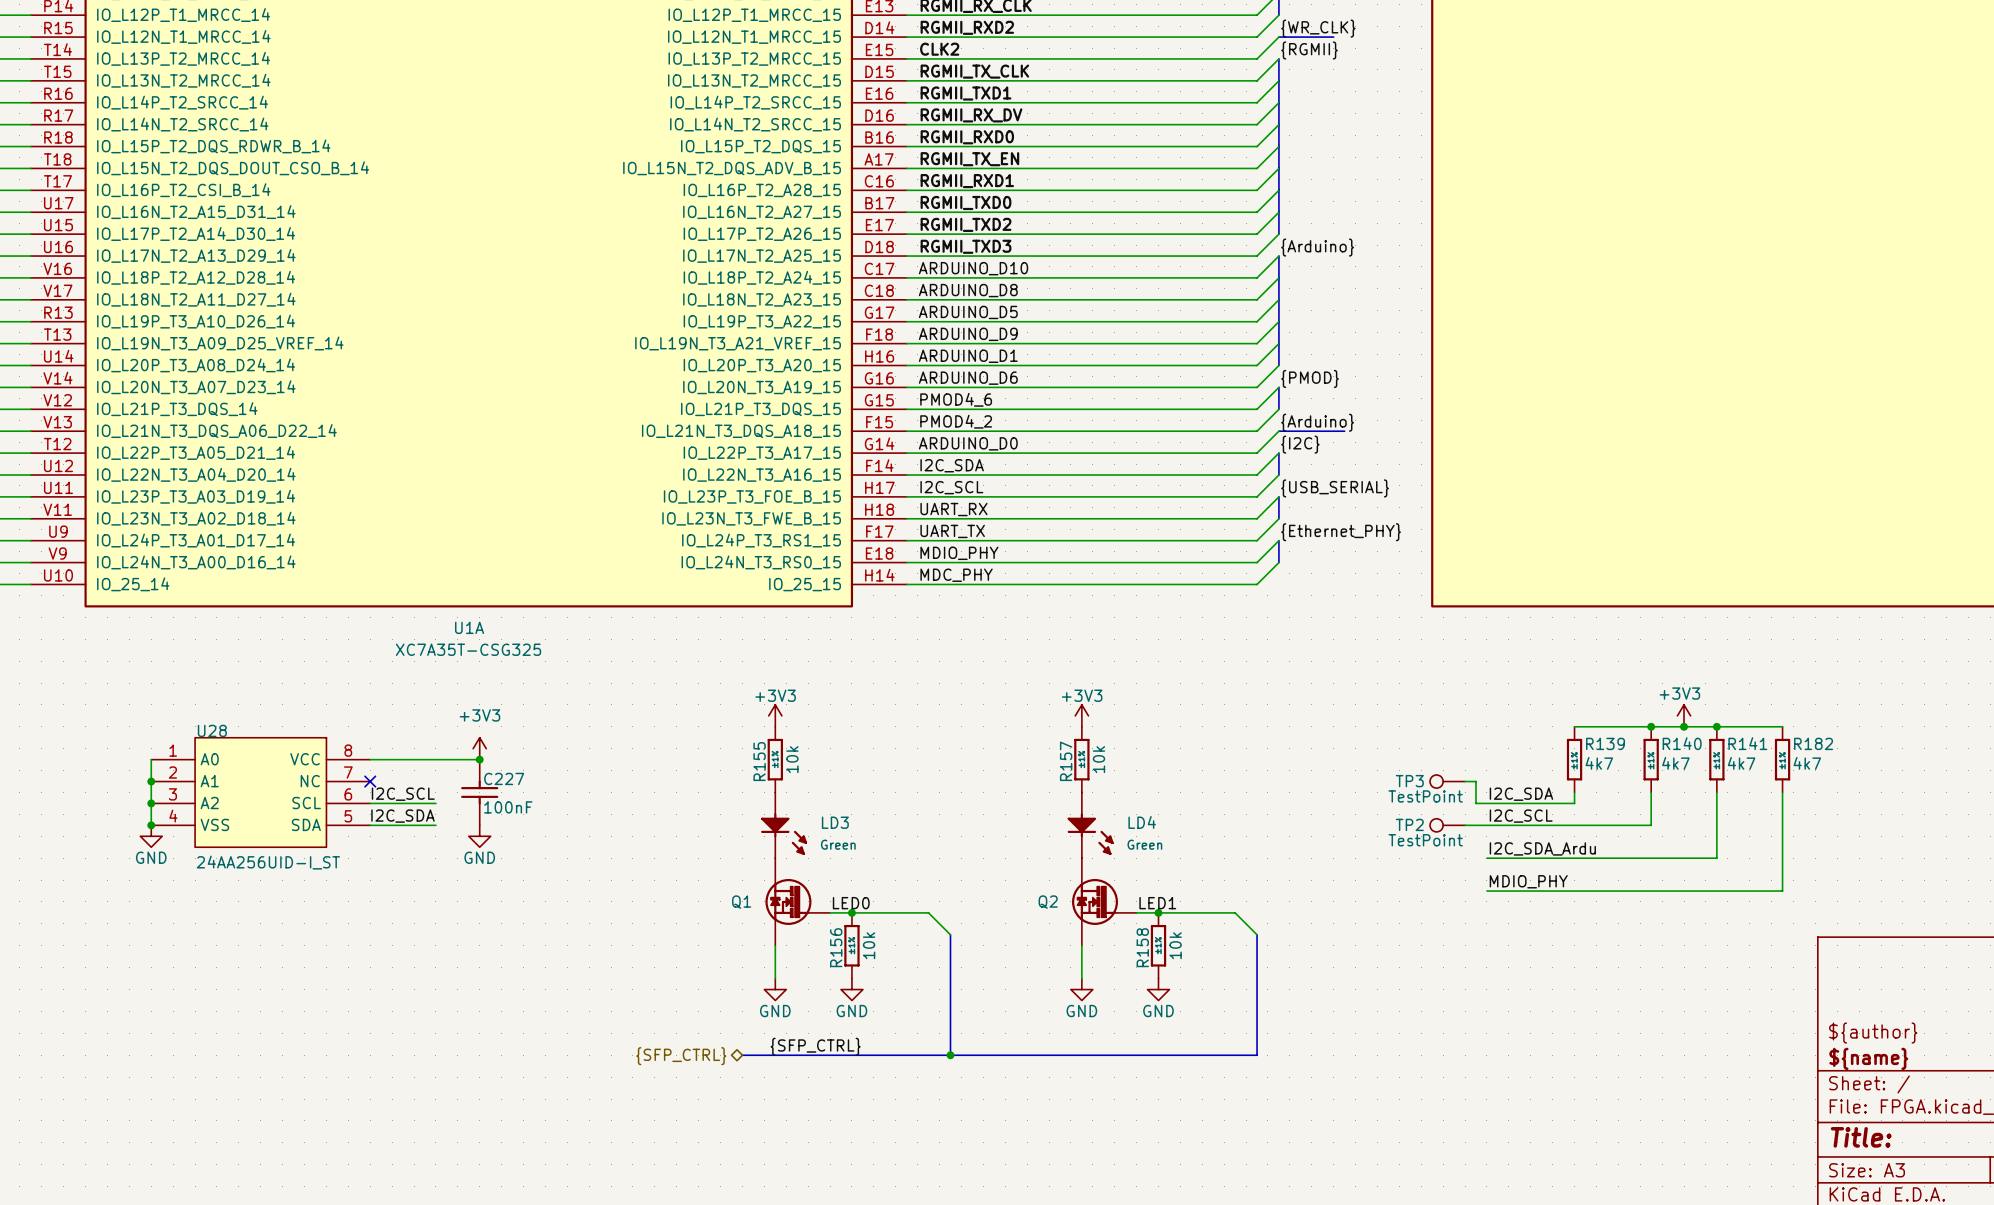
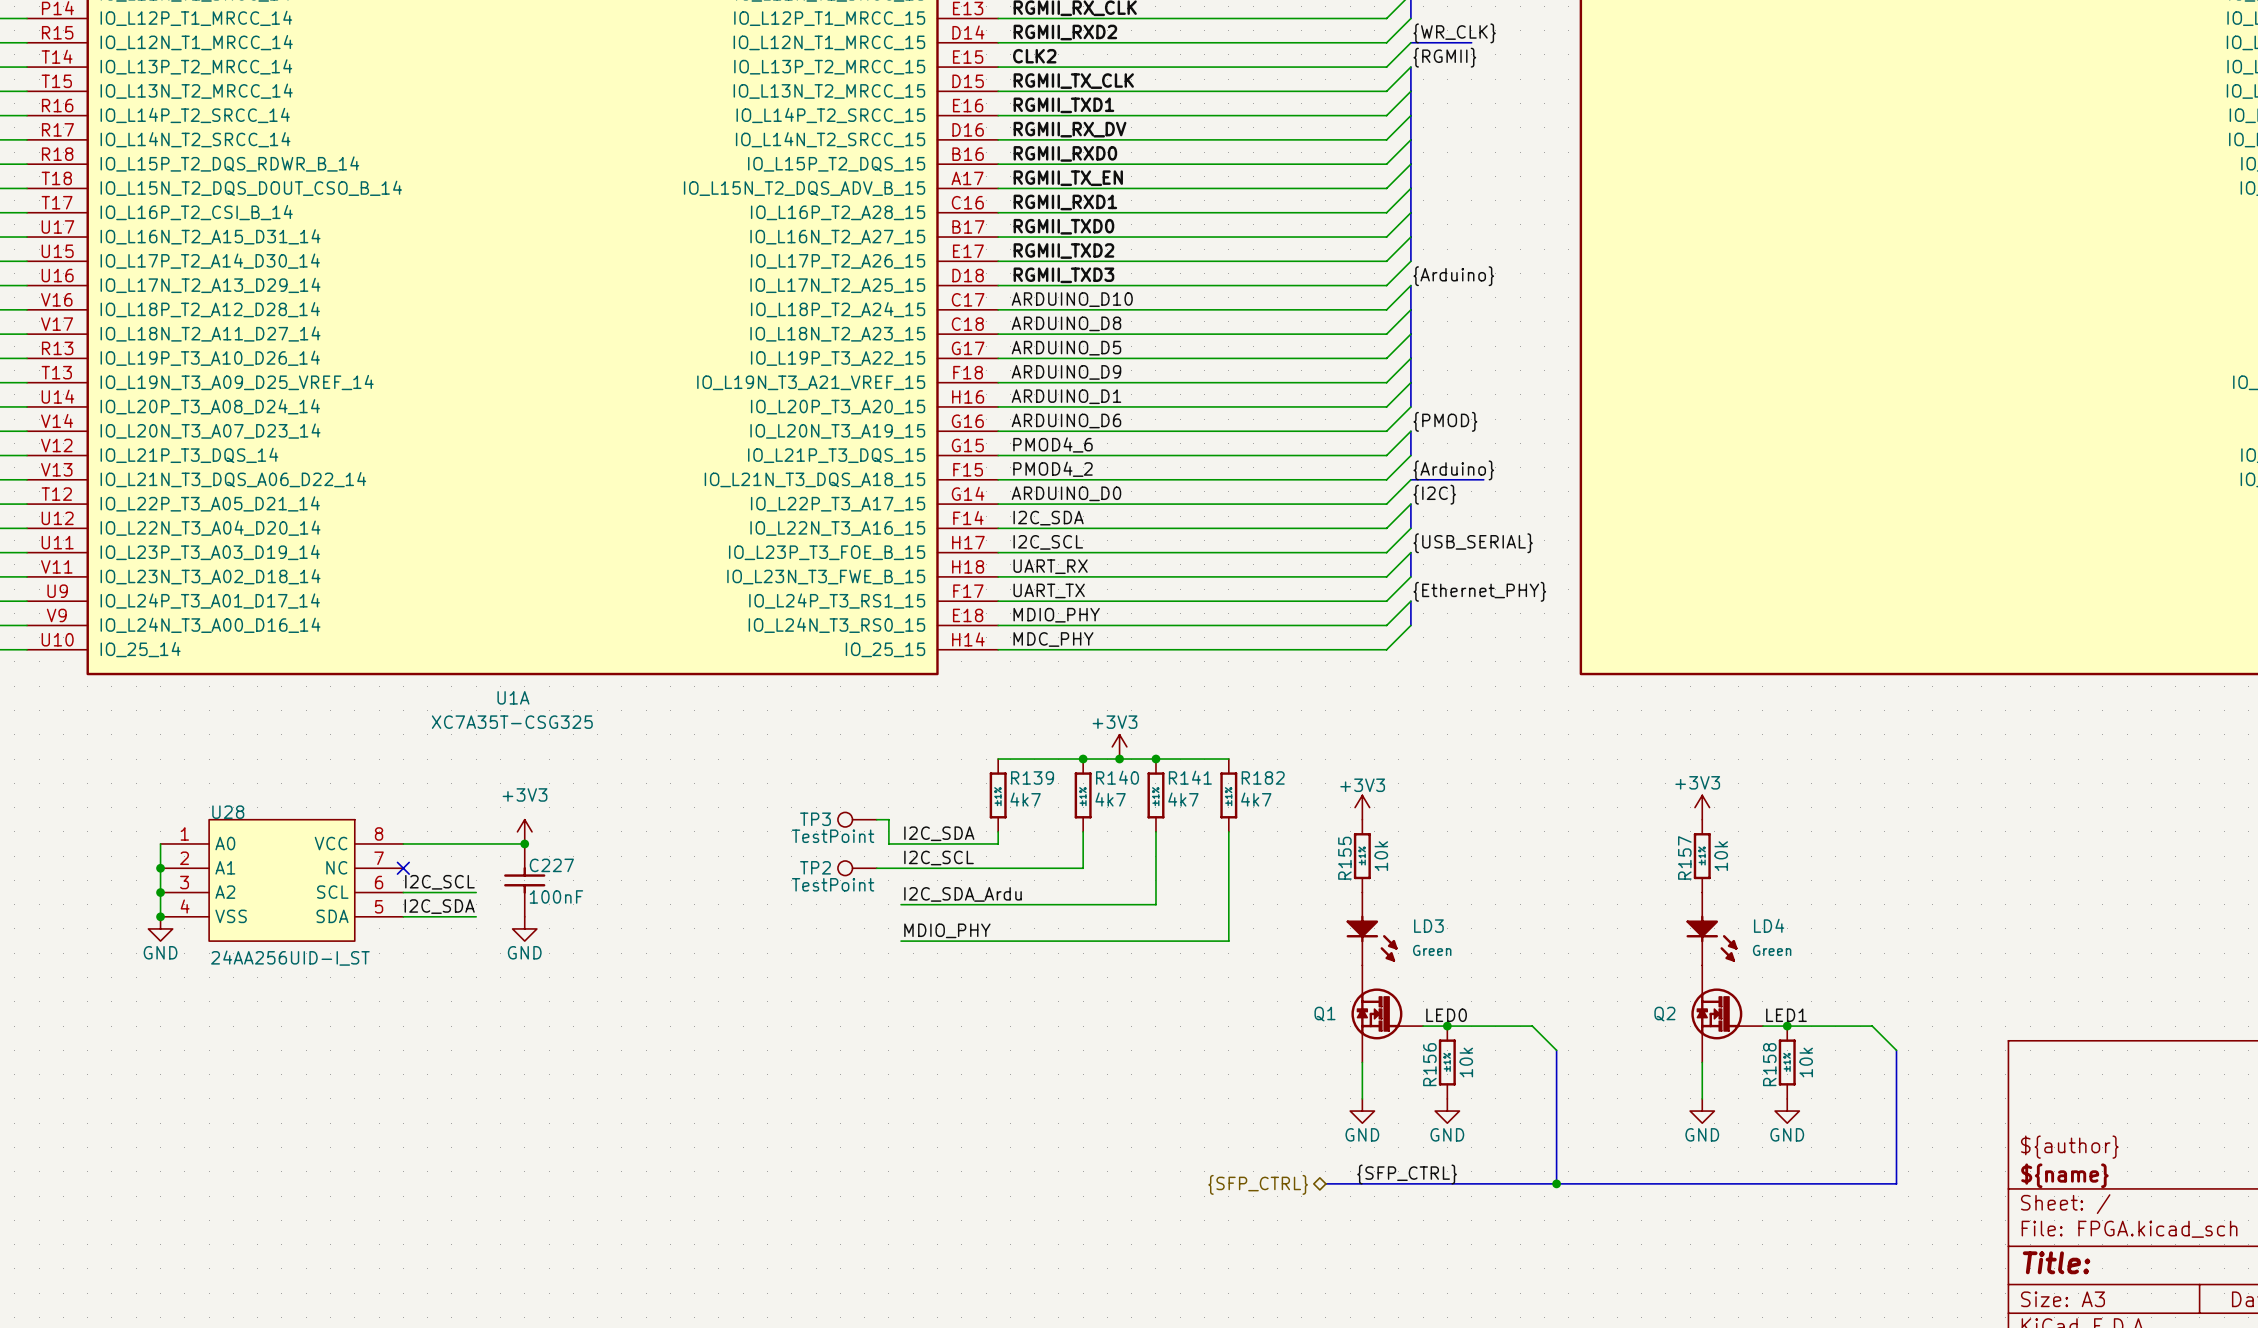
power symbol: none -> +3V3 (1119, 746)
wire: none -> (998, 759) (1228, 759)
junction: none -> (1083, 759)
junction: none -> (1119, 759)
junction: none -> (1155, 759)
power symbol: +3V3 (775, 715) -> none
power symbol: +3V3 (1081, 715) -> none
power symbol position: +3V3 (1684, 715) -> +3V3 (1702, 807)
power symbol: none -> +3V3 (1362, 807)
wire: (1574, 726) (1782, 726) -> none
junction: (1651, 726) -> none
junction: (1684, 726) -> none
junction: (1716, 726) -> none
wire: none -> (876, 819) (888, 819) (888, 843) (998, 843) (998, 831)
wire: none -> (1083, 831) (1083, 868) (876, 868)
wire: none -> (1155, 831) (1155, 904) (901, 904)
wire: none -> (1228, 831) (1228, 941) (901, 941)
label: none -> I2C_SDA (939, 833)
R155 position: (775, 759) -> (1362, 856)
R157 position: (1081, 759) -> (1702, 856)
R139 position: (1574, 759) -> (998, 795)
R140 position: (1651, 759) -> (1083, 795)
R141 position: (1716, 759) -> (1155, 795)
R182 position: (1782, 759) -> (1228, 795)
label: none -> I2C_SCL (939, 858)
TP3 position: (1447, 781) -> (857, 819)
wire: (1465, 781) (1476, 781) (1476, 803) (1574, 803) (1574, 792) -> none
wire: (1651, 792) (1651, 825) (1465, 825) -> none
wire: (1716, 792) (1716, 858) (1486, 858) -> none
wire: (1782, 792) (1782, 891) (1486, 891) -> none
label: I2C_SDA (1521, 794) -> none
label: none -> I2C_SDA_Ardu (963, 894)
label: I2C_SCL (1521, 816) -> none
LD3 position: (784, 825) -> (1372, 928)
LD4 position: (1090, 825) -> (1711, 928)
TP2 position: (1447, 825) -> (857, 868)
label: none -> MDIO_PHY (947, 930)
label: I2C_SDA_Ardu (1542, 848) -> none
label: MDIO_PHY (1528, 881) -> none
Q1 position: (797, 901) -> (1387, 1013)
Q2 position: (1104, 901) -> (1727, 1013)
label: LED0 (851, 903) -> none
label: LED1 (1157, 903) -> none
wire: (830, 912) (928, 912) (950, 934) -> none
junction: (851, 912) -> none
wire: (1136, 912) (1235, 912) (1257, 934) -> (1423, 1026) (1532, 1026) (1556, 1050)
junction: (1158, 912) -> none
label: none -> LED0 (1446, 1015)
label: none -> LED1 (1786, 1015)
junction: none -> (1447, 1026)
wire: none -> (1762, 1026) (1872, 1026) (1896, 1050)
junction: none -> (1787, 1026)
bus: (950, 934) (950, 1055) -> none
bus: (1257, 934) (1257, 1055) (742, 1055) -> none
wire: (775, 945) (775, 978) -> none
R156 position: (851, 945) -> (1447, 1062)
wire: (1081, 945) (1081, 978) -> (1362, 1062) (1362, 1098)
R158 position: (1158, 945) -> (1787, 1062)
bus: none -> (1556, 1050) (1556, 1183)
bus: none -> (1896, 1050) (1896, 1183) (1325, 1183)
wire: none -> (1702, 1062) (1702, 1098)
power symbol: GND (775, 989) -> none
power symbol: GND (851, 989) -> none
power symbol: GND (1081, 989) -> none
power symbol: GND (1158, 989) -> none
power symbol: none -> GND (1362, 1111)
power symbol: none -> GND (1447, 1111)
power symbol: none -> GND (1702, 1111)
power symbol: none -> GND (1787, 1111)
label: {SFP_CTRL} (815, 1046) -> none
junction: (950, 1055) -> none
hierarchical label: {SFP_CTRL} (681, 1056) -> none
label: none -> {SFP_CTRL} (1407, 1174)
junction: none -> (1556, 1183)
hierarchical label: none -> {SFP_CTRL} (1258, 1184)

